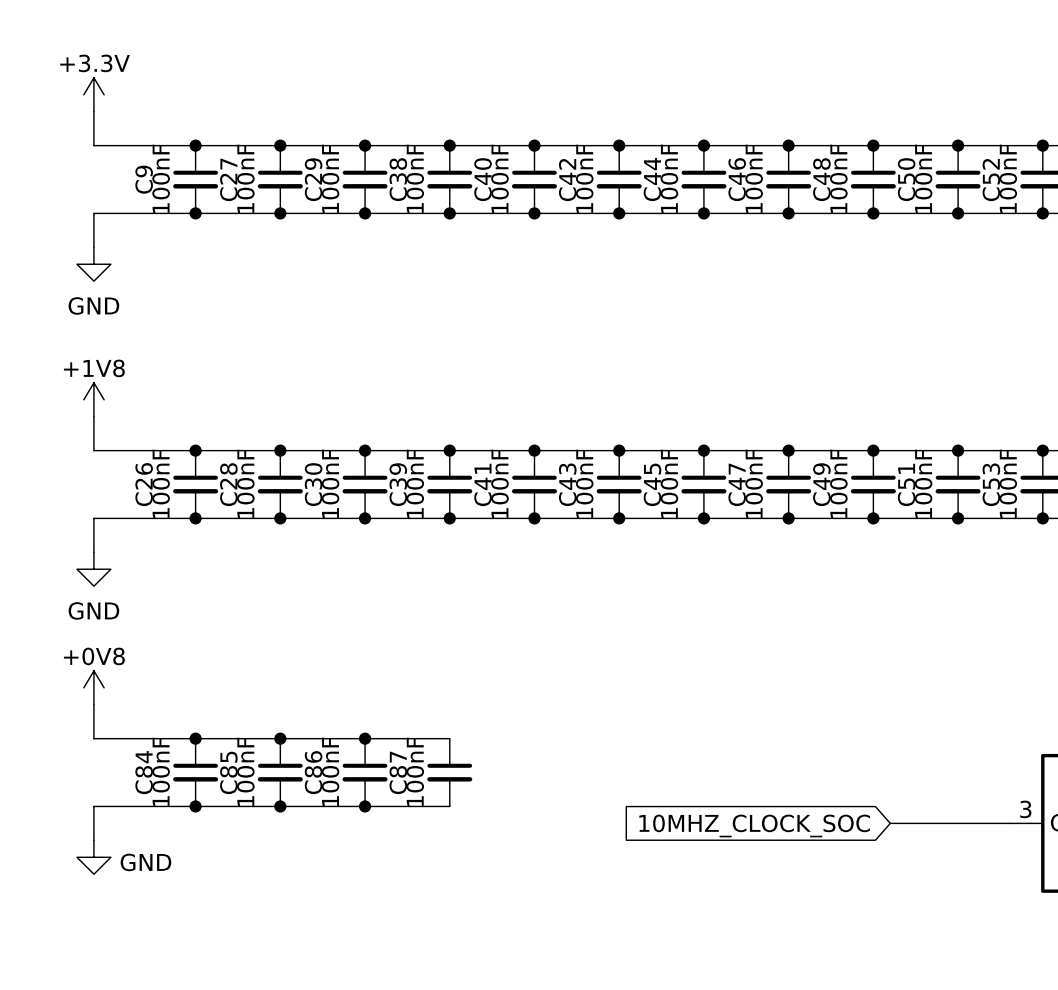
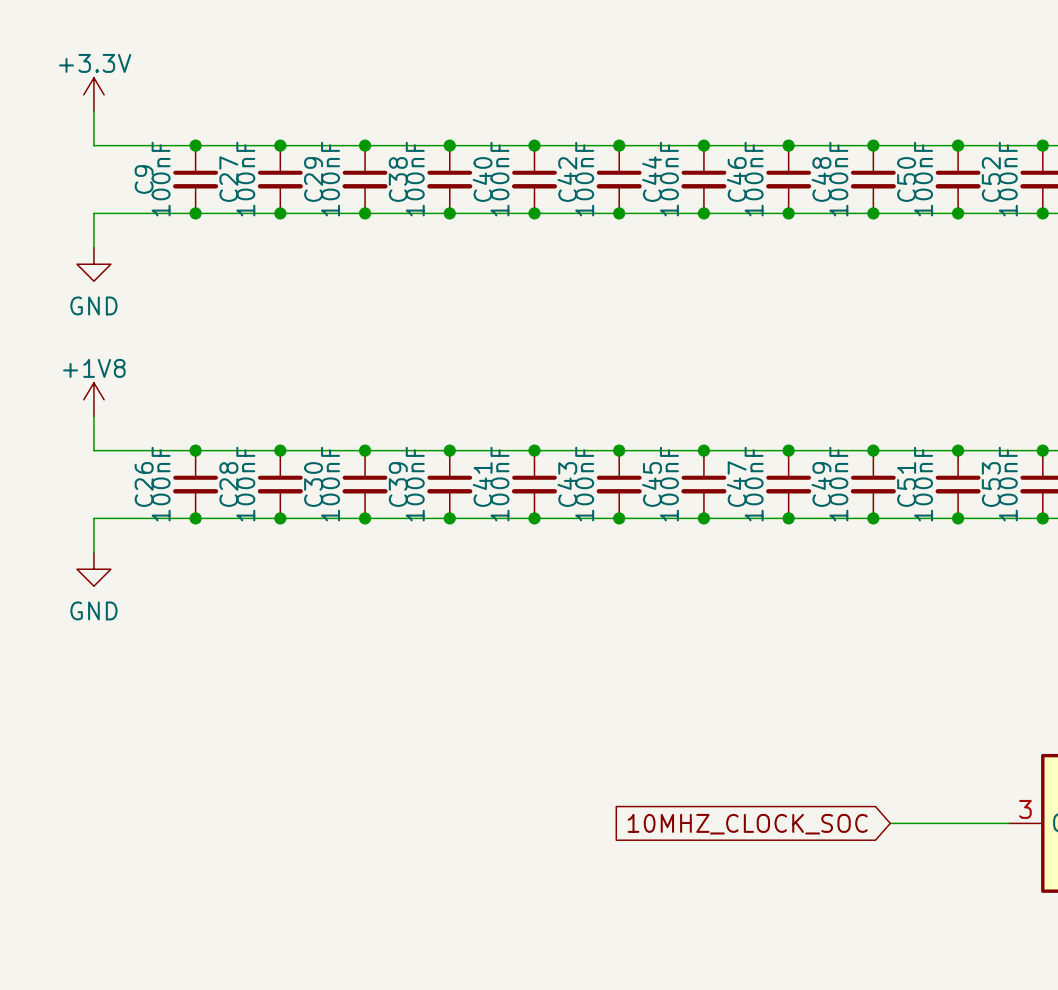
power symbol: +0V8 (93, 687) -> none
wire: (93, 704) (93, 738) (449, 738) -> none
junction: (195, 738) -> none
junction: (280, 738) -> none
junction: (365, 738) -> none
C84: 100nF (195, 772) -> none
C85: 100nF (280, 772) -> none
C86: 100nF (365, 772) -> none
C87: 100nF (449, 772) -> none
junction: (195, 806) -> none
junction: (280, 806) -> none
junction: (365, 806) -> none
wire: (449, 806) (93, 806) (93, 840) -> none
power symbol: GND (93, 857) -> none

